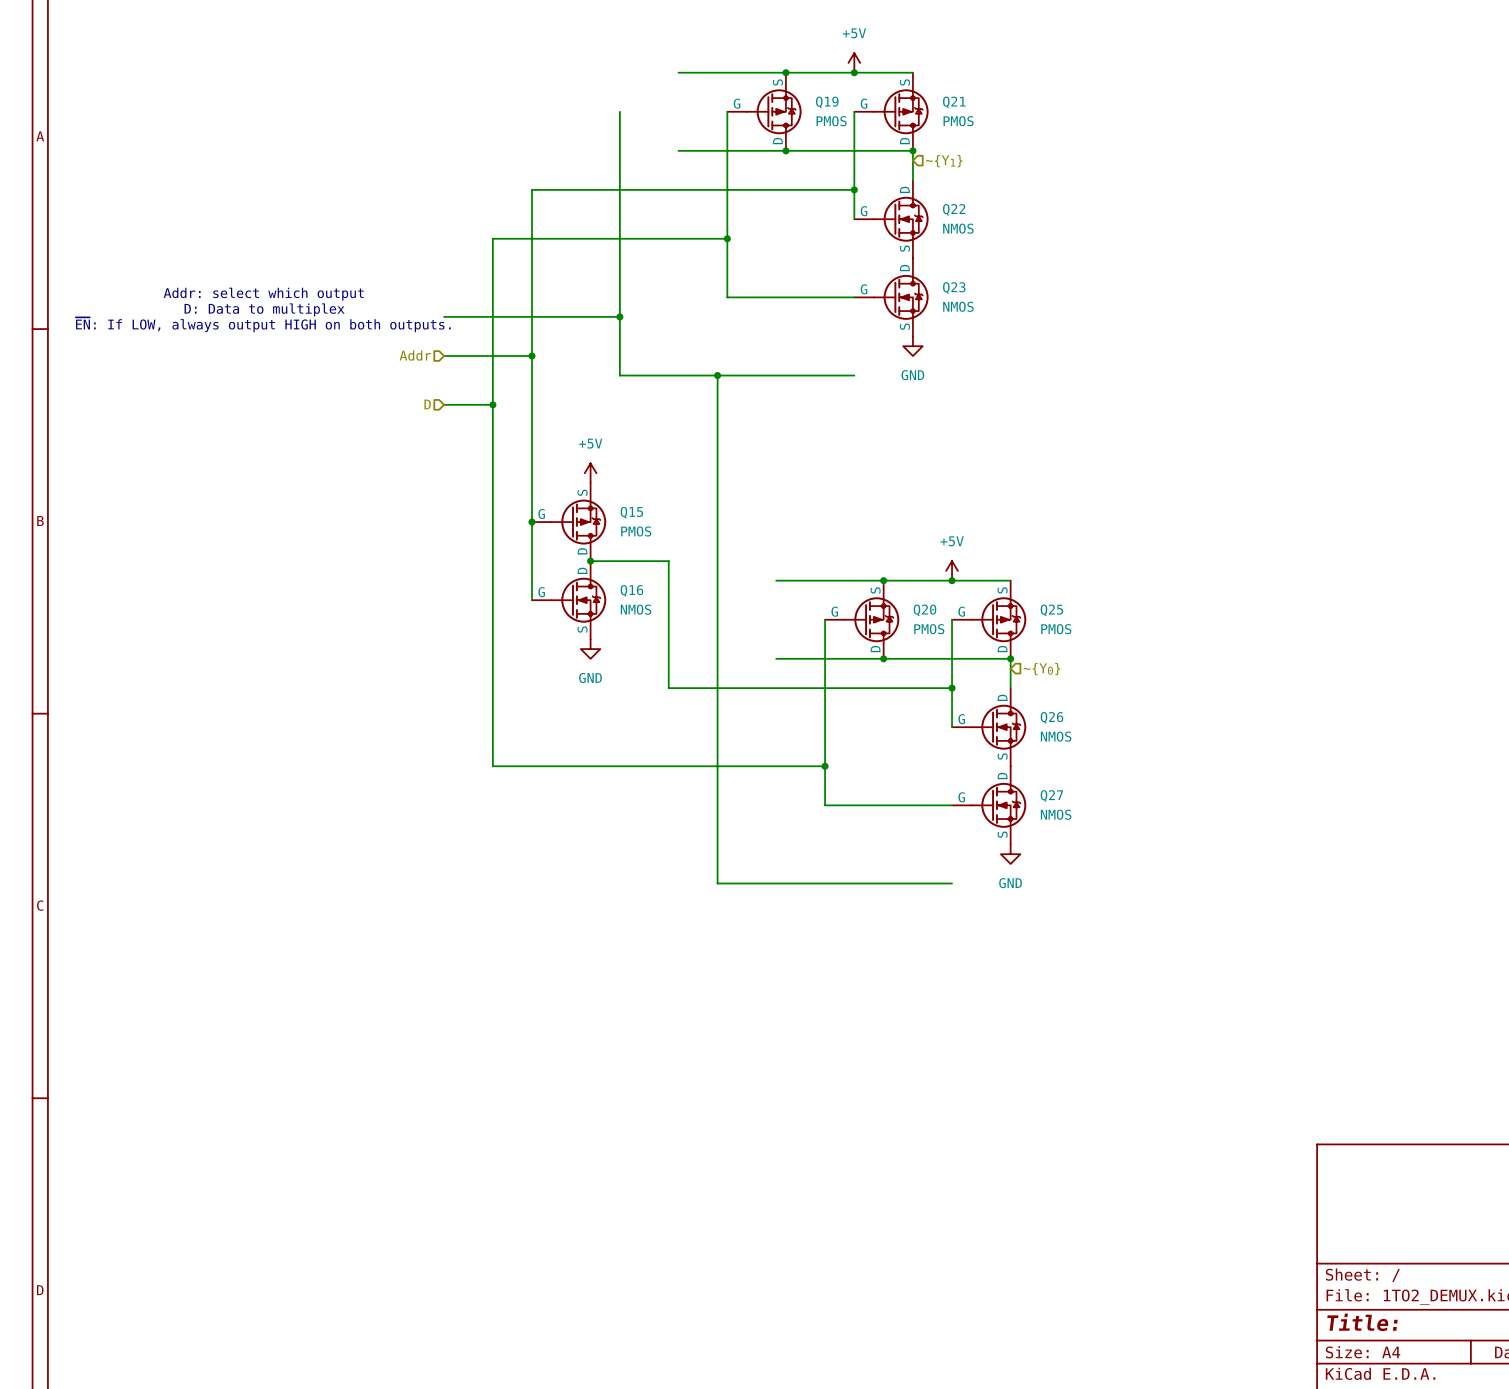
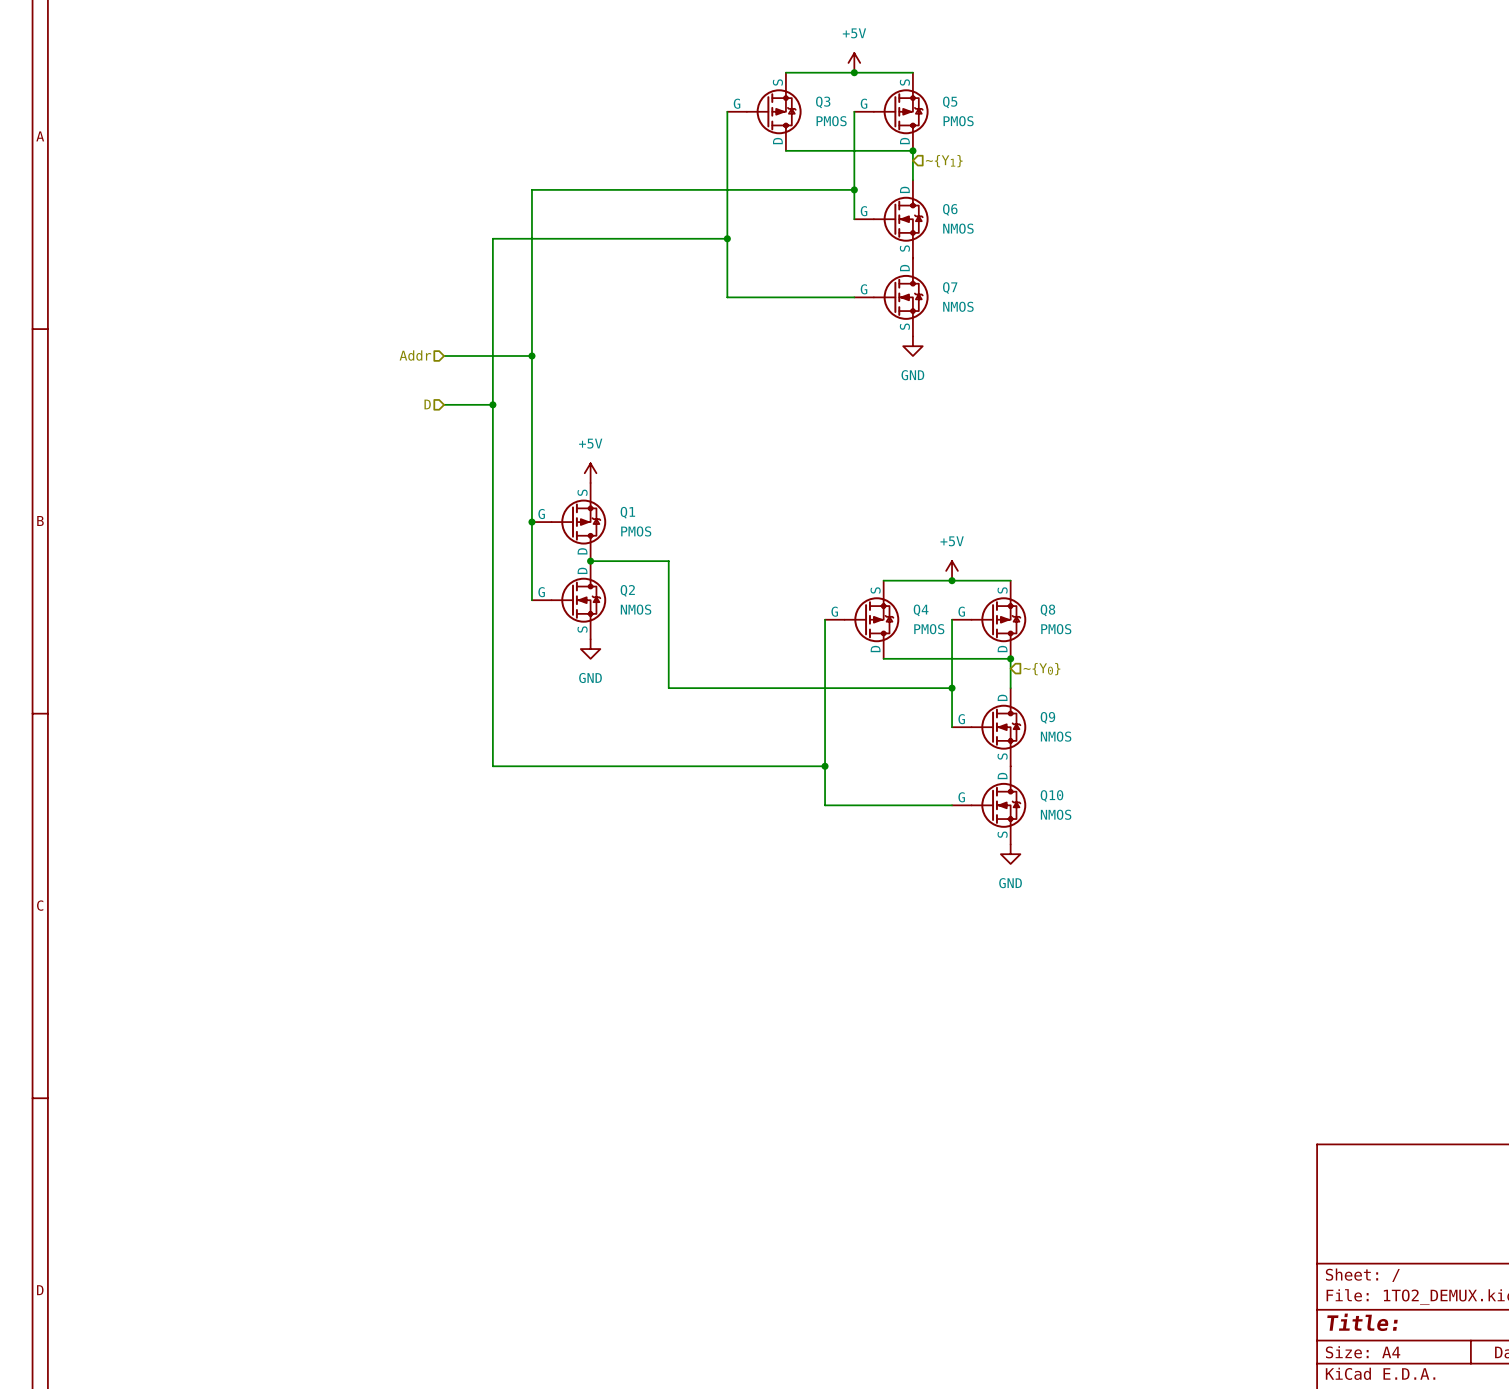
wire: (678, 72) (785, 72) -> none
junction: (785, 72) -> none
Q19 name: Q19 (827, 102) -> Q3 (823, 102)
Q21 name: Q21 (954, 102) -> Q5 (950, 102)
wire: (619, 111) (619, 375) (854, 375) -> none
wire: (678, 150) (785, 150) -> none
junction: (785, 150) -> none
Q22 name: Q22 (954, 209) -> Q6 (950, 209)
Q23 name: Q23 (954, 288) -> Q7 (950, 288)
text: Addr: select which output (263, 294) -> none
text: D: Data to multiplex (264, 309) -> none
wire: (444, 316) (619, 316) -> none
junction: (619, 316) -> none
text: ~{EN}: If LOW, always output HIGH on both outputs. (263, 324) -> none
wire: (717, 375) (717, 883) (952, 883) -> none
junction: (717, 375) -> none
Q15 name: Q15 (631, 512) -> Q1 (627, 512)
wire: (776, 580) (883, 580) -> none
junction: (883, 580) -> none
Q16 name: Q16 (631, 590) -> Q2 (627, 590)
Q20 name: Q20 (925, 610) -> Q4 (921, 610)
Q25 name: Q25 (1051, 610) -> Q8 (1047, 610)
wire: (776, 658) (883, 658) -> none
junction: (883, 658) -> none
Q26 name: Q26 (1051, 717) -> Q9 (1047, 717)
Q27 name: Q27 (1051, 796) -> Q10 (1051, 796)

